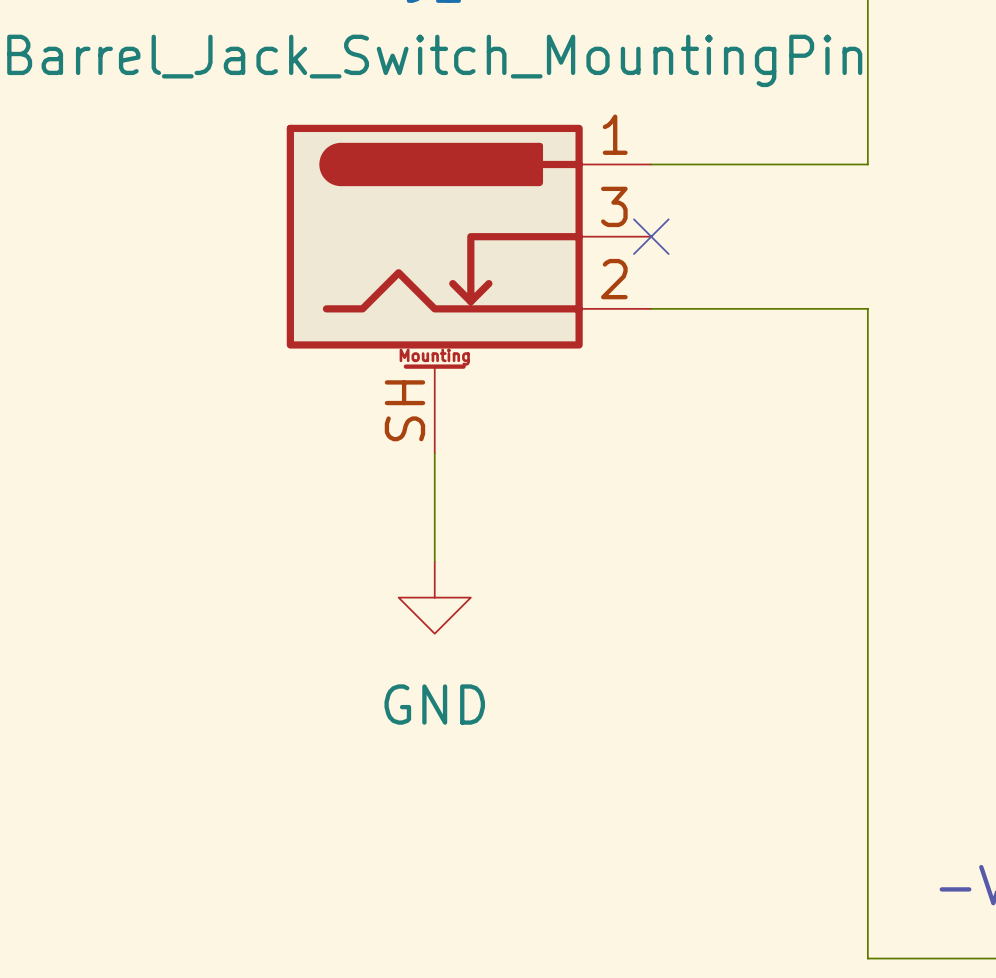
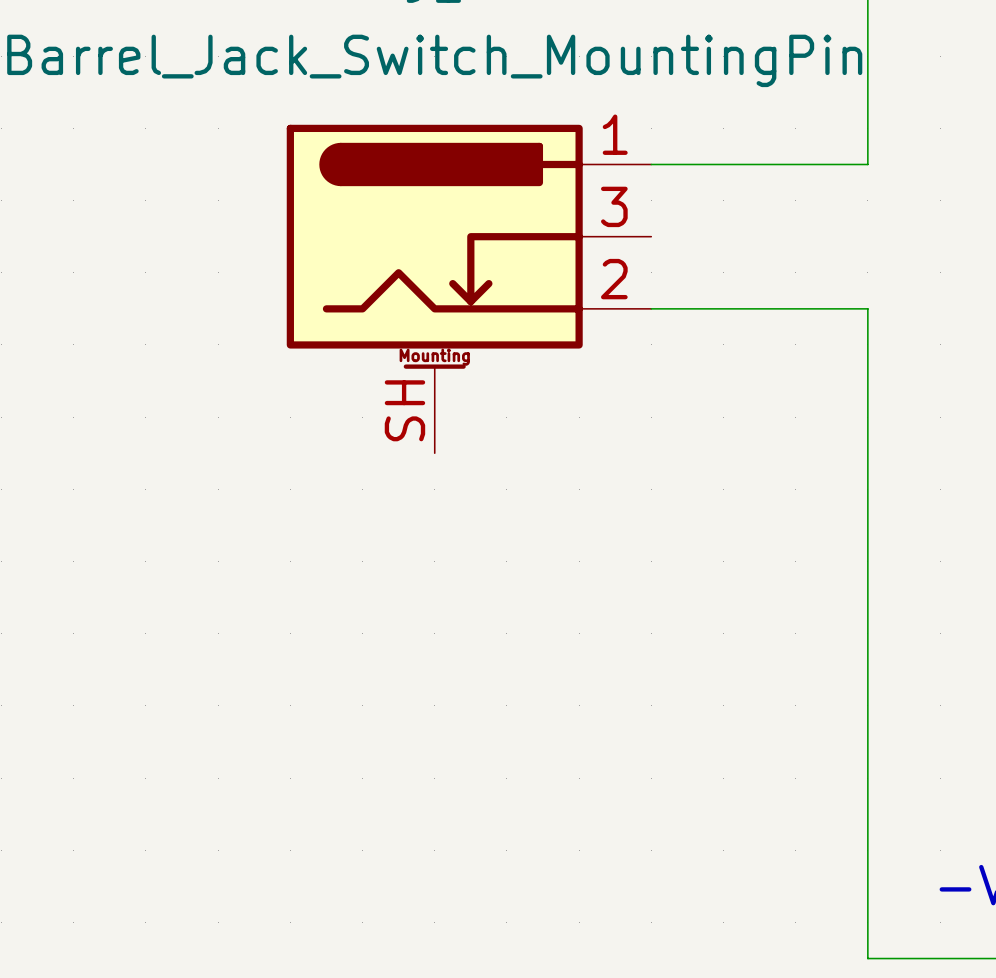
no-connect mark: (651, 236) -> none
wire: (434, 453) (434, 561) -> none
power symbol: GND (434, 597) -> none

